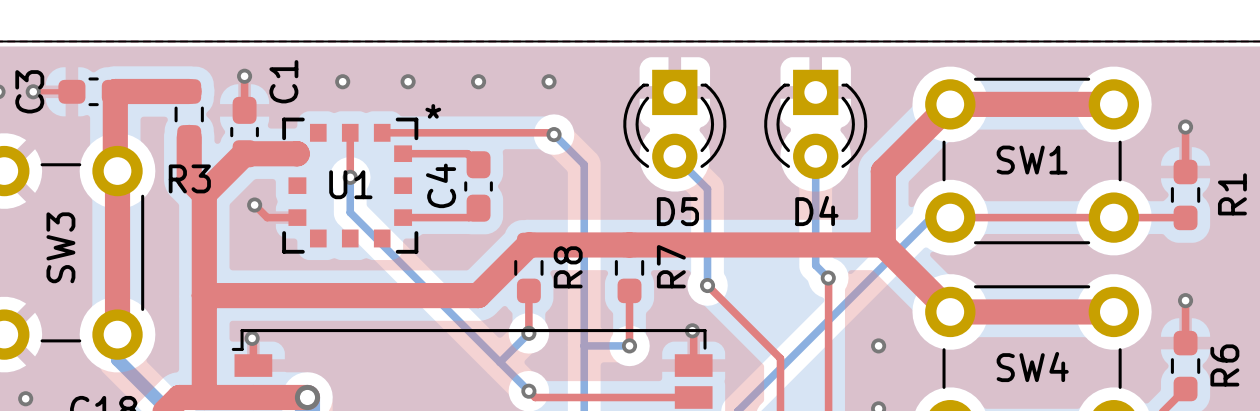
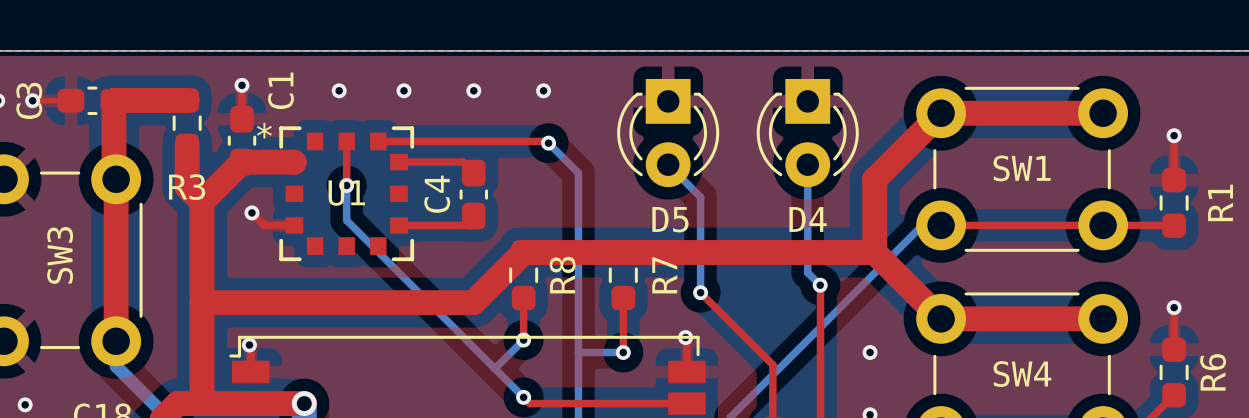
U1 text position: * (433, 111) -> * (264, 130)

